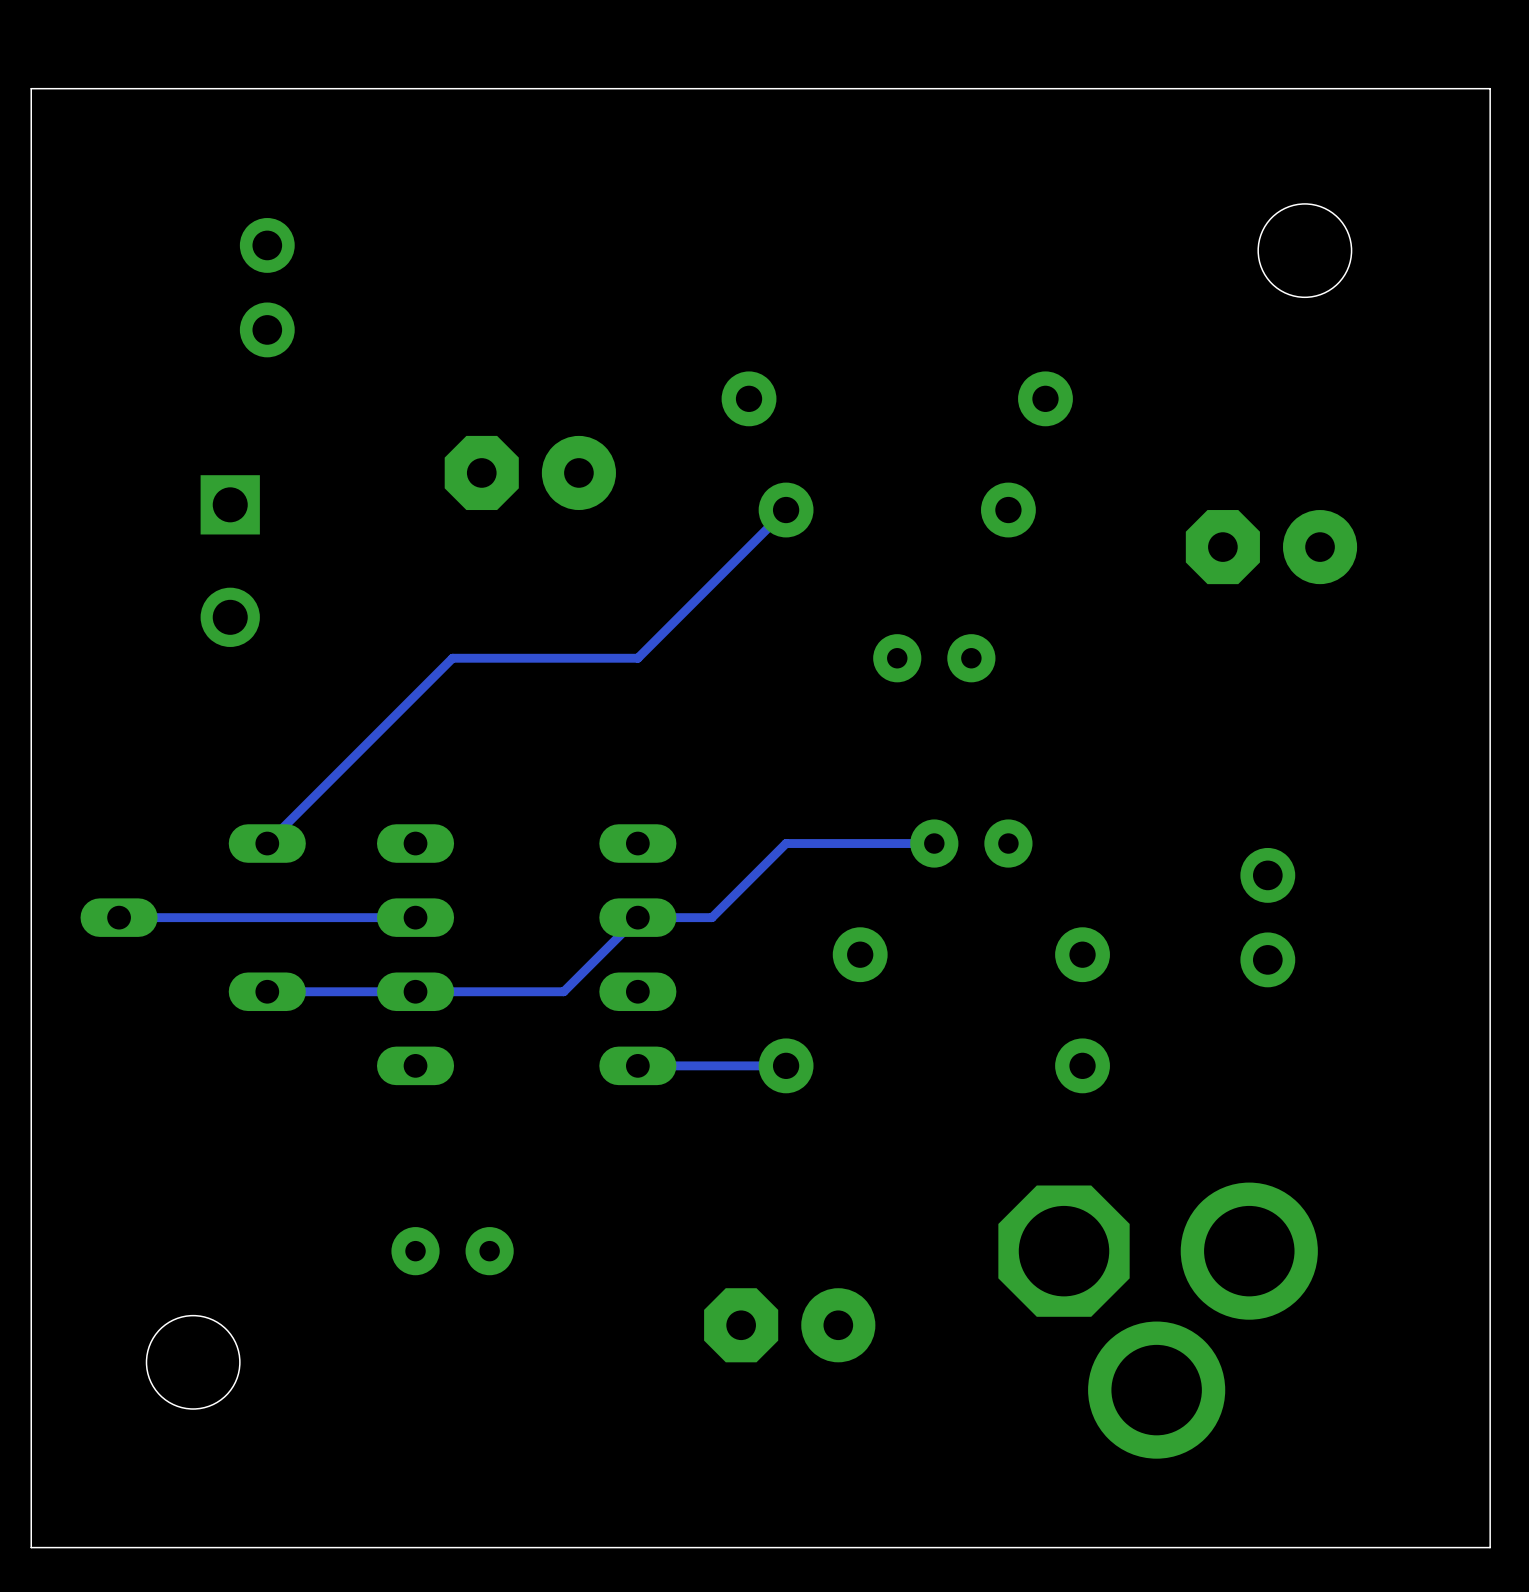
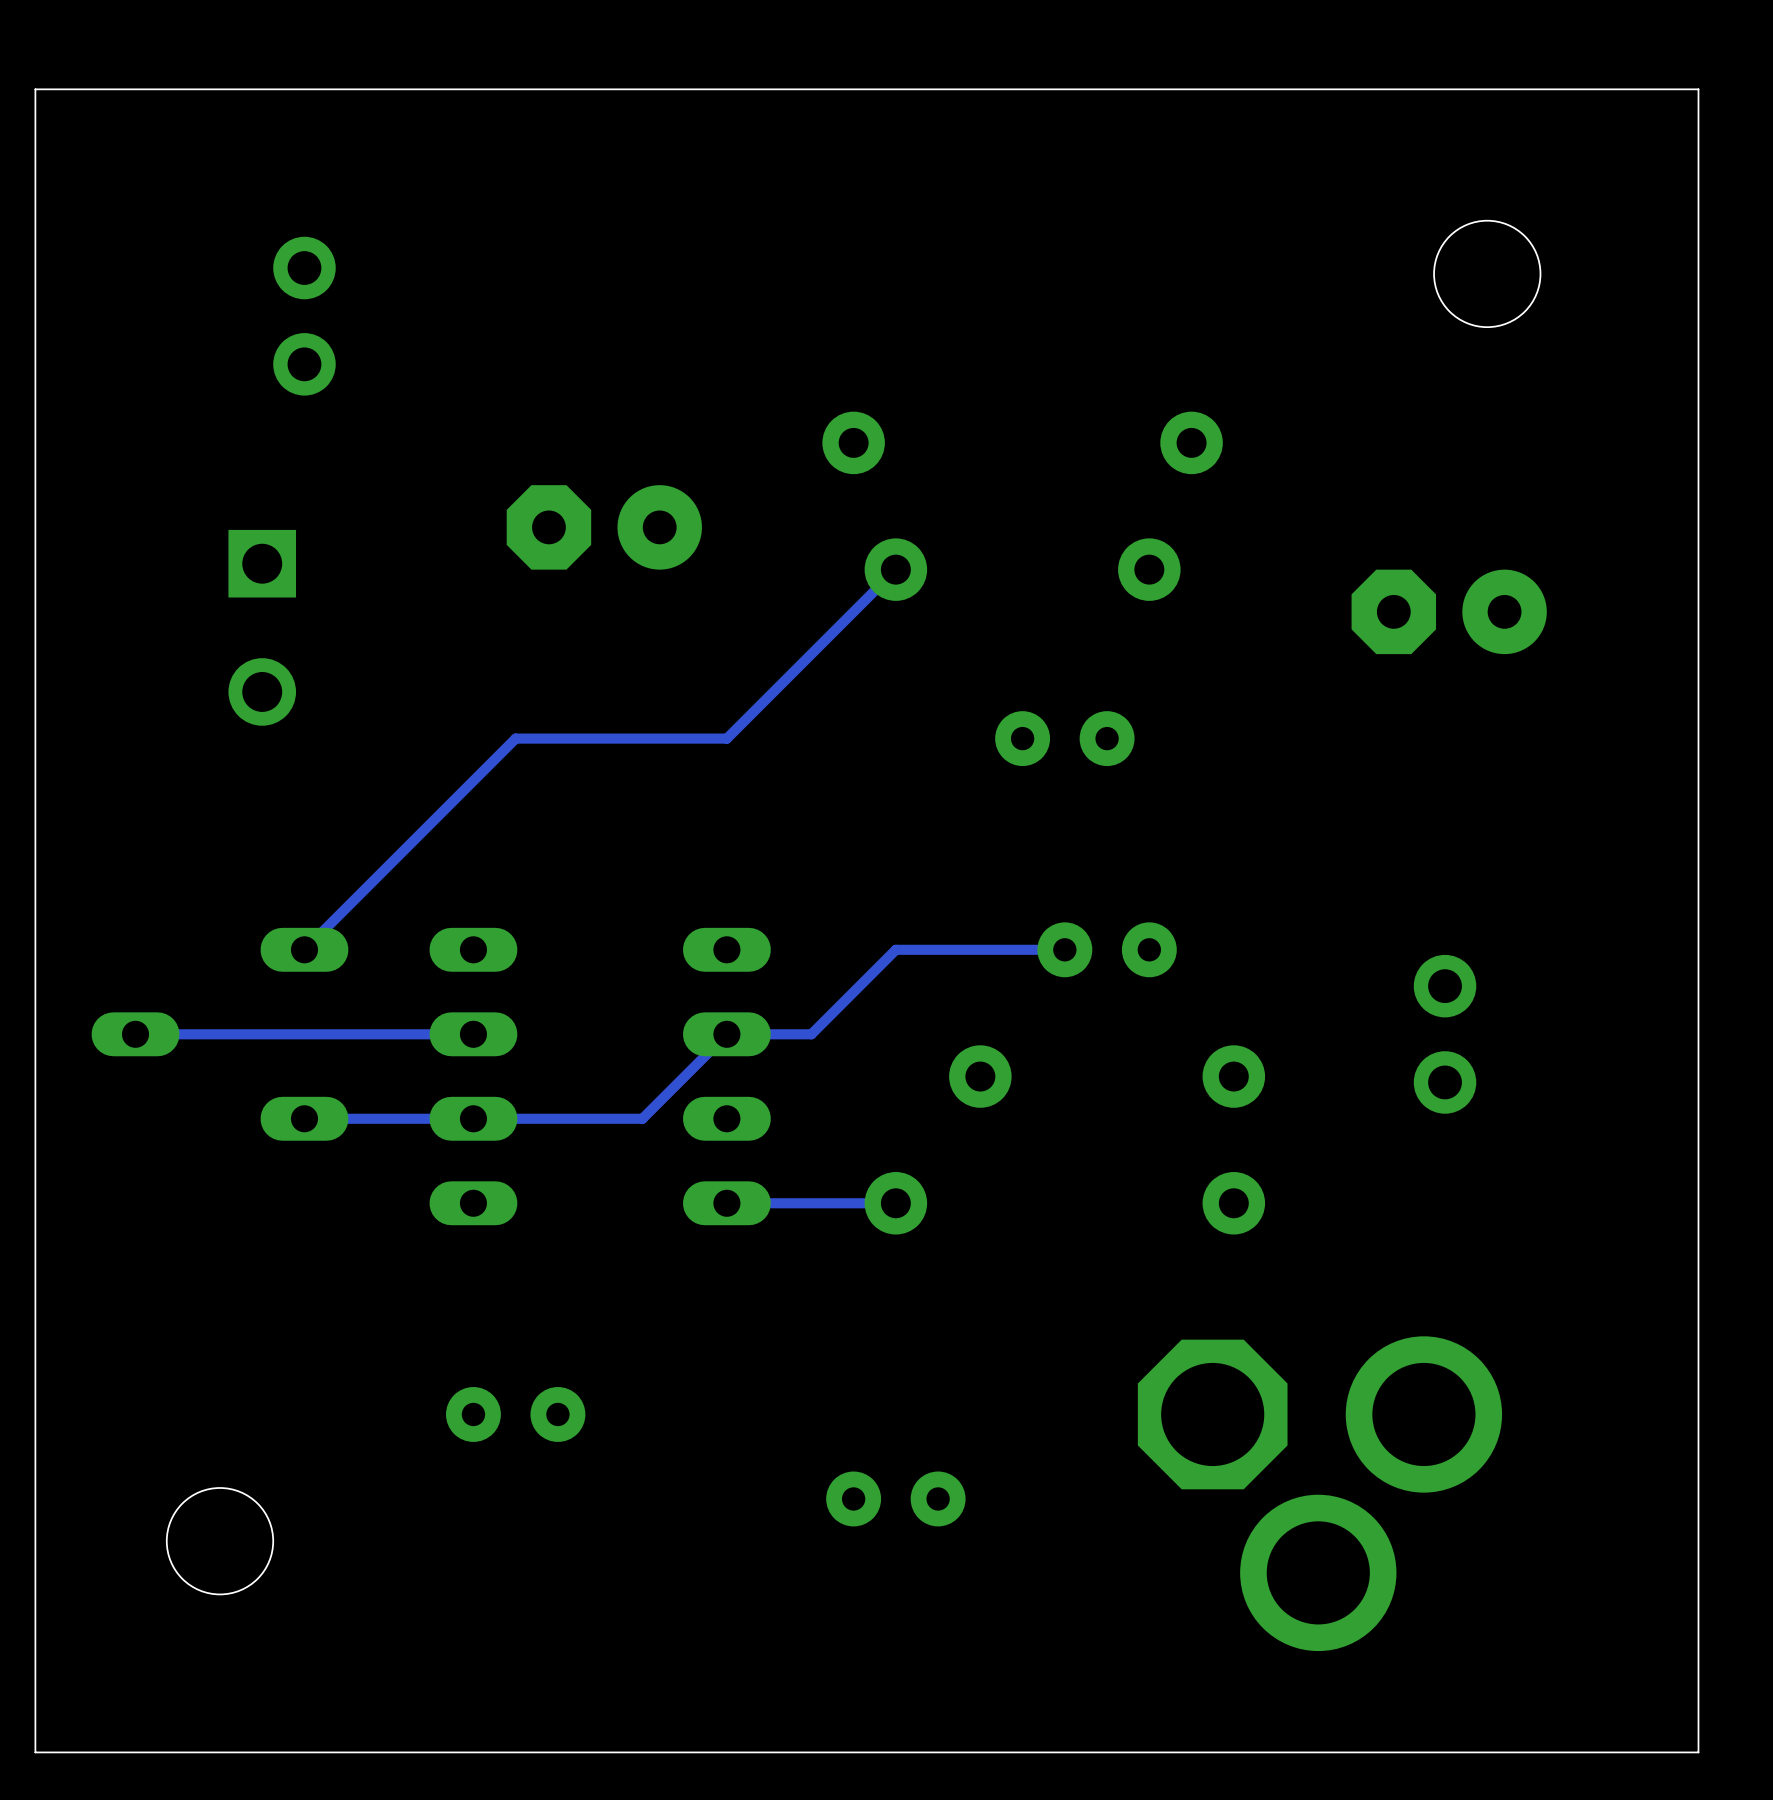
part footprint: [704, 1288, 876, 1363] -> [826, 1471, 966, 1527]

